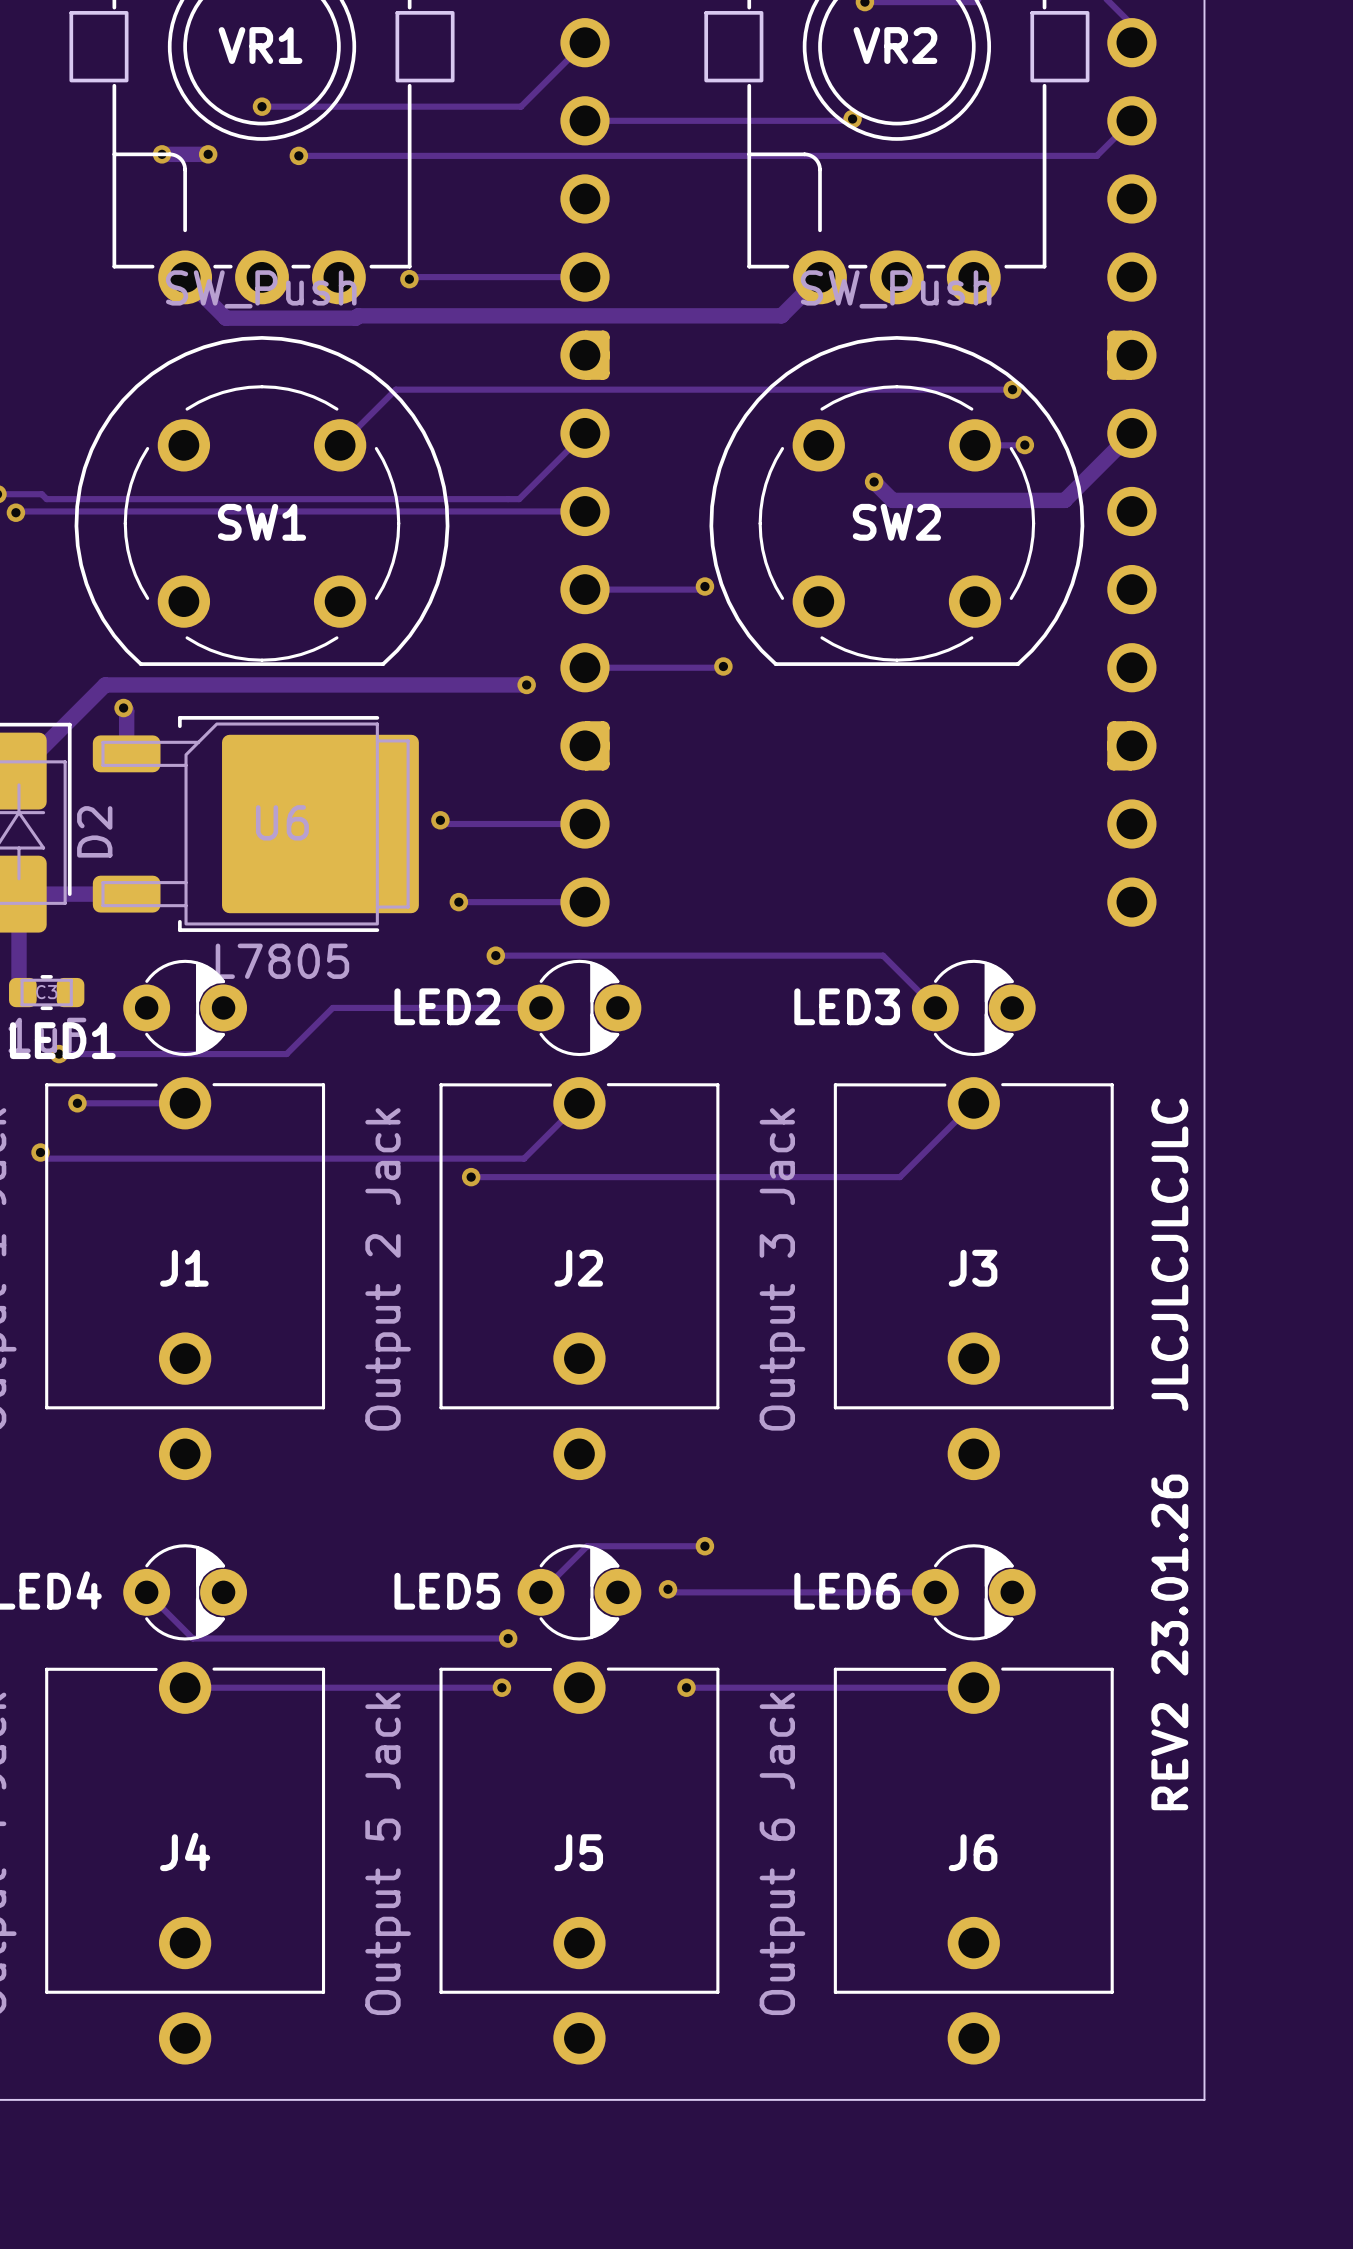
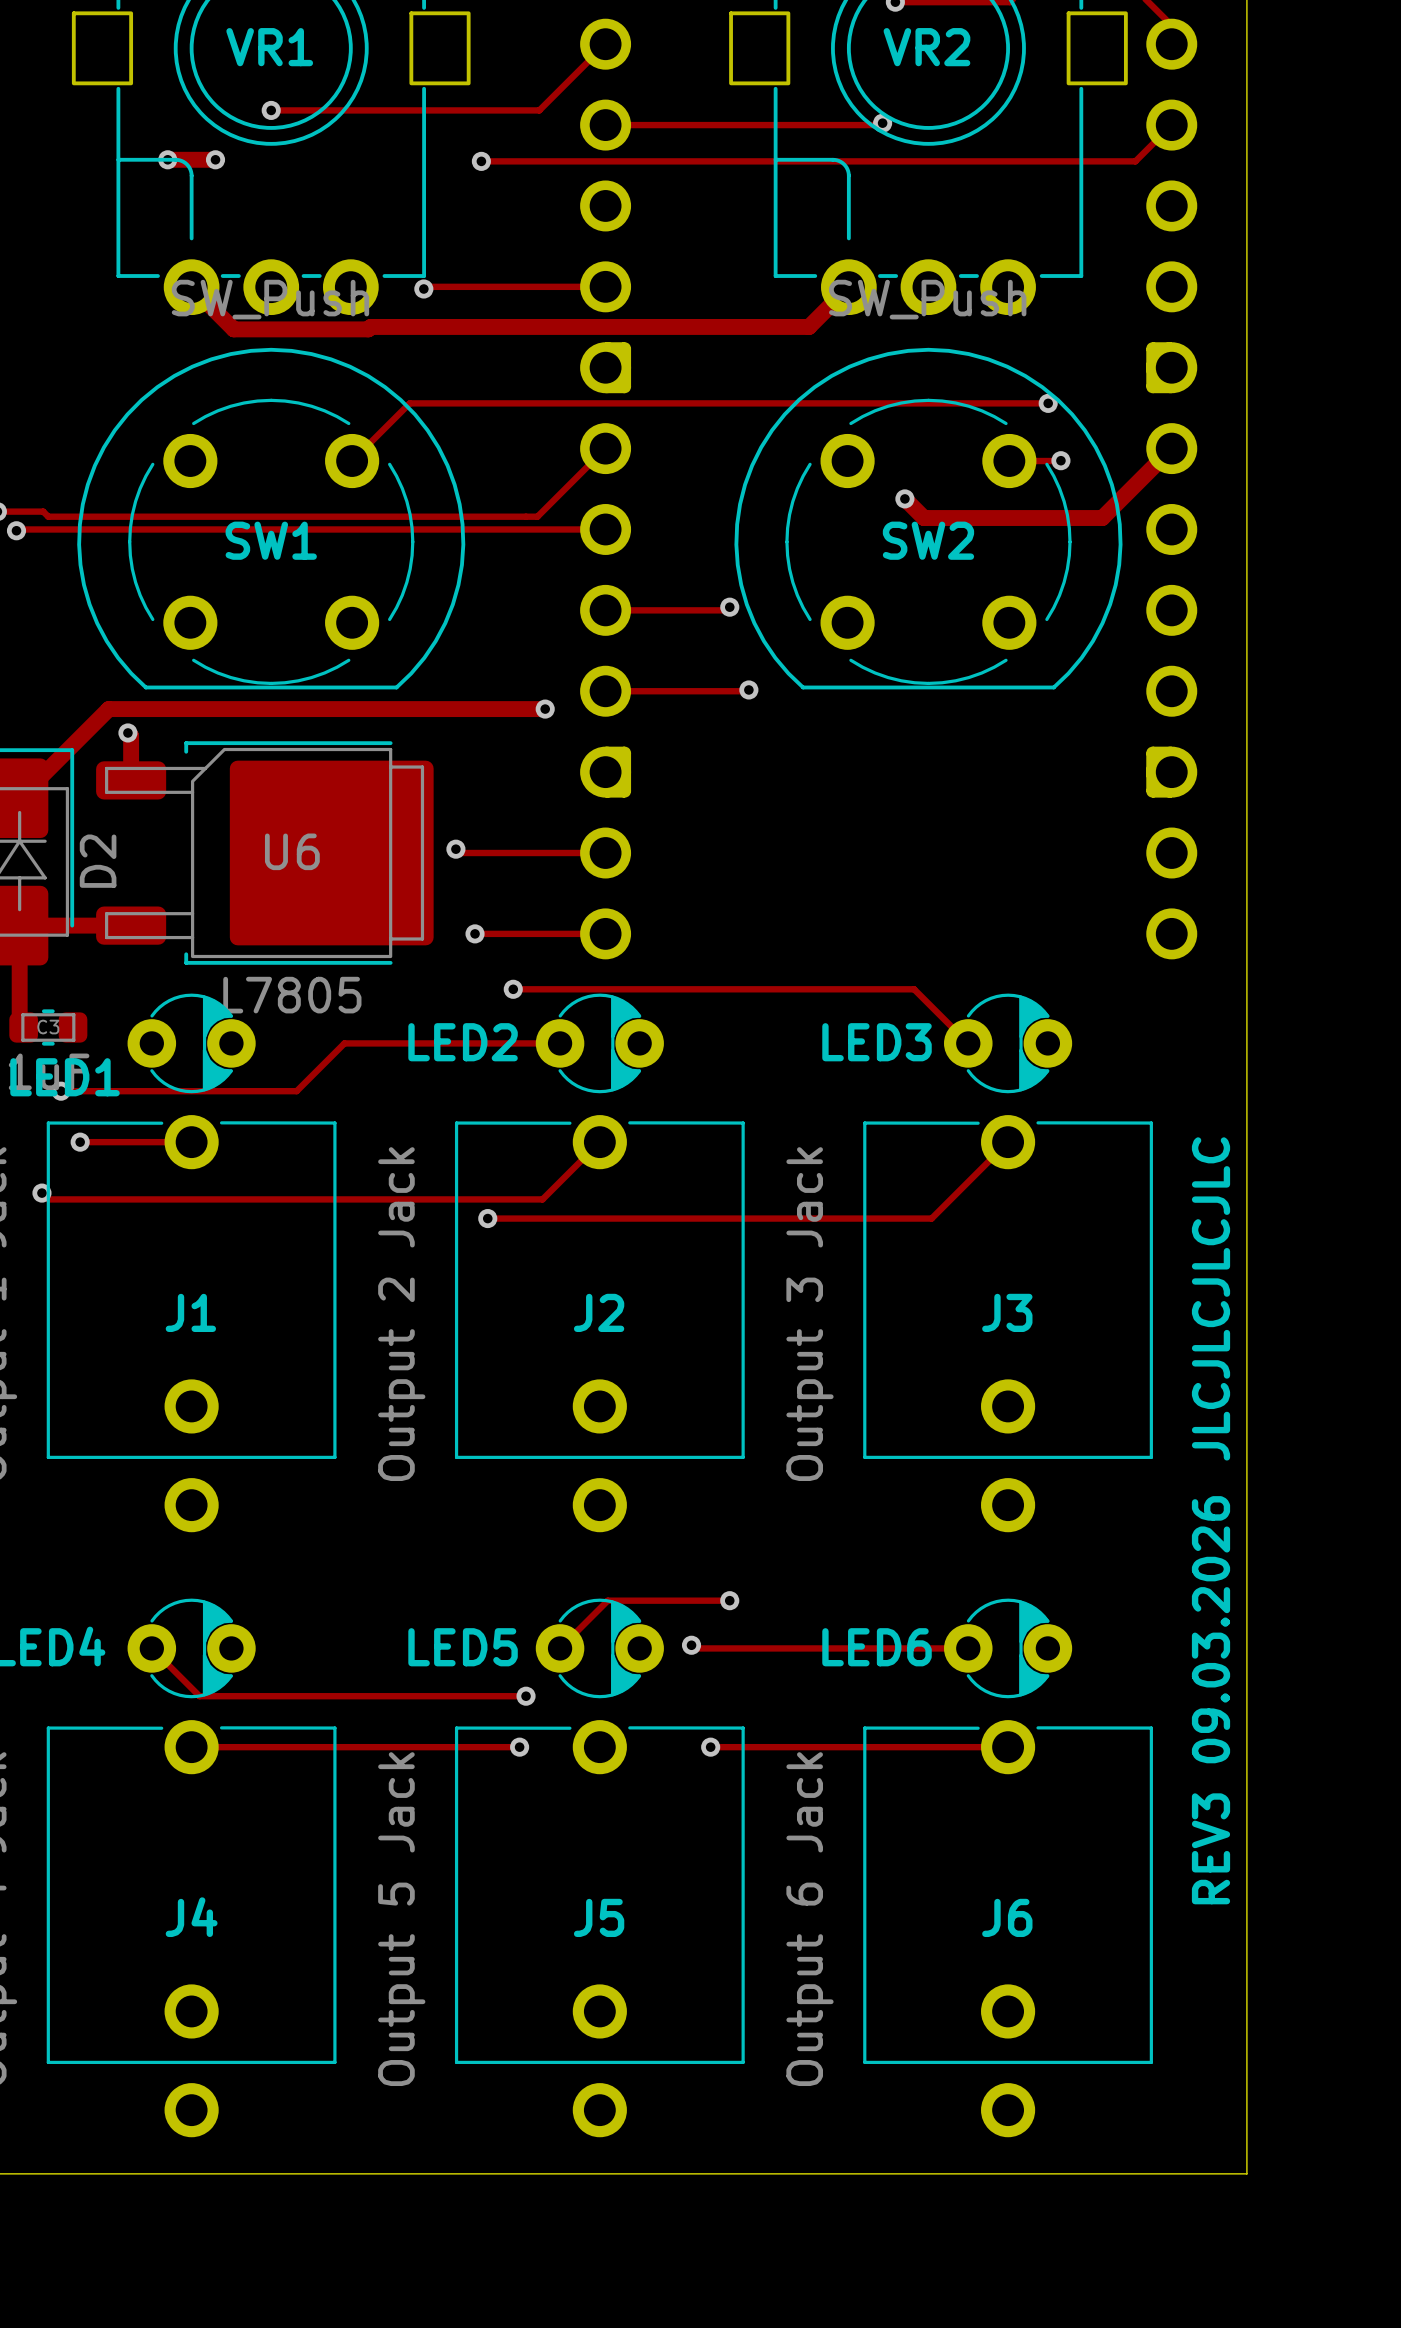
track: (298, 155) (465, 155) -> none
via position: (298, 155) -> (481, 161)
text: REV2 23.01.26 (1169, 1642) -> REV3 09.03.2026 (1211, 1700)

